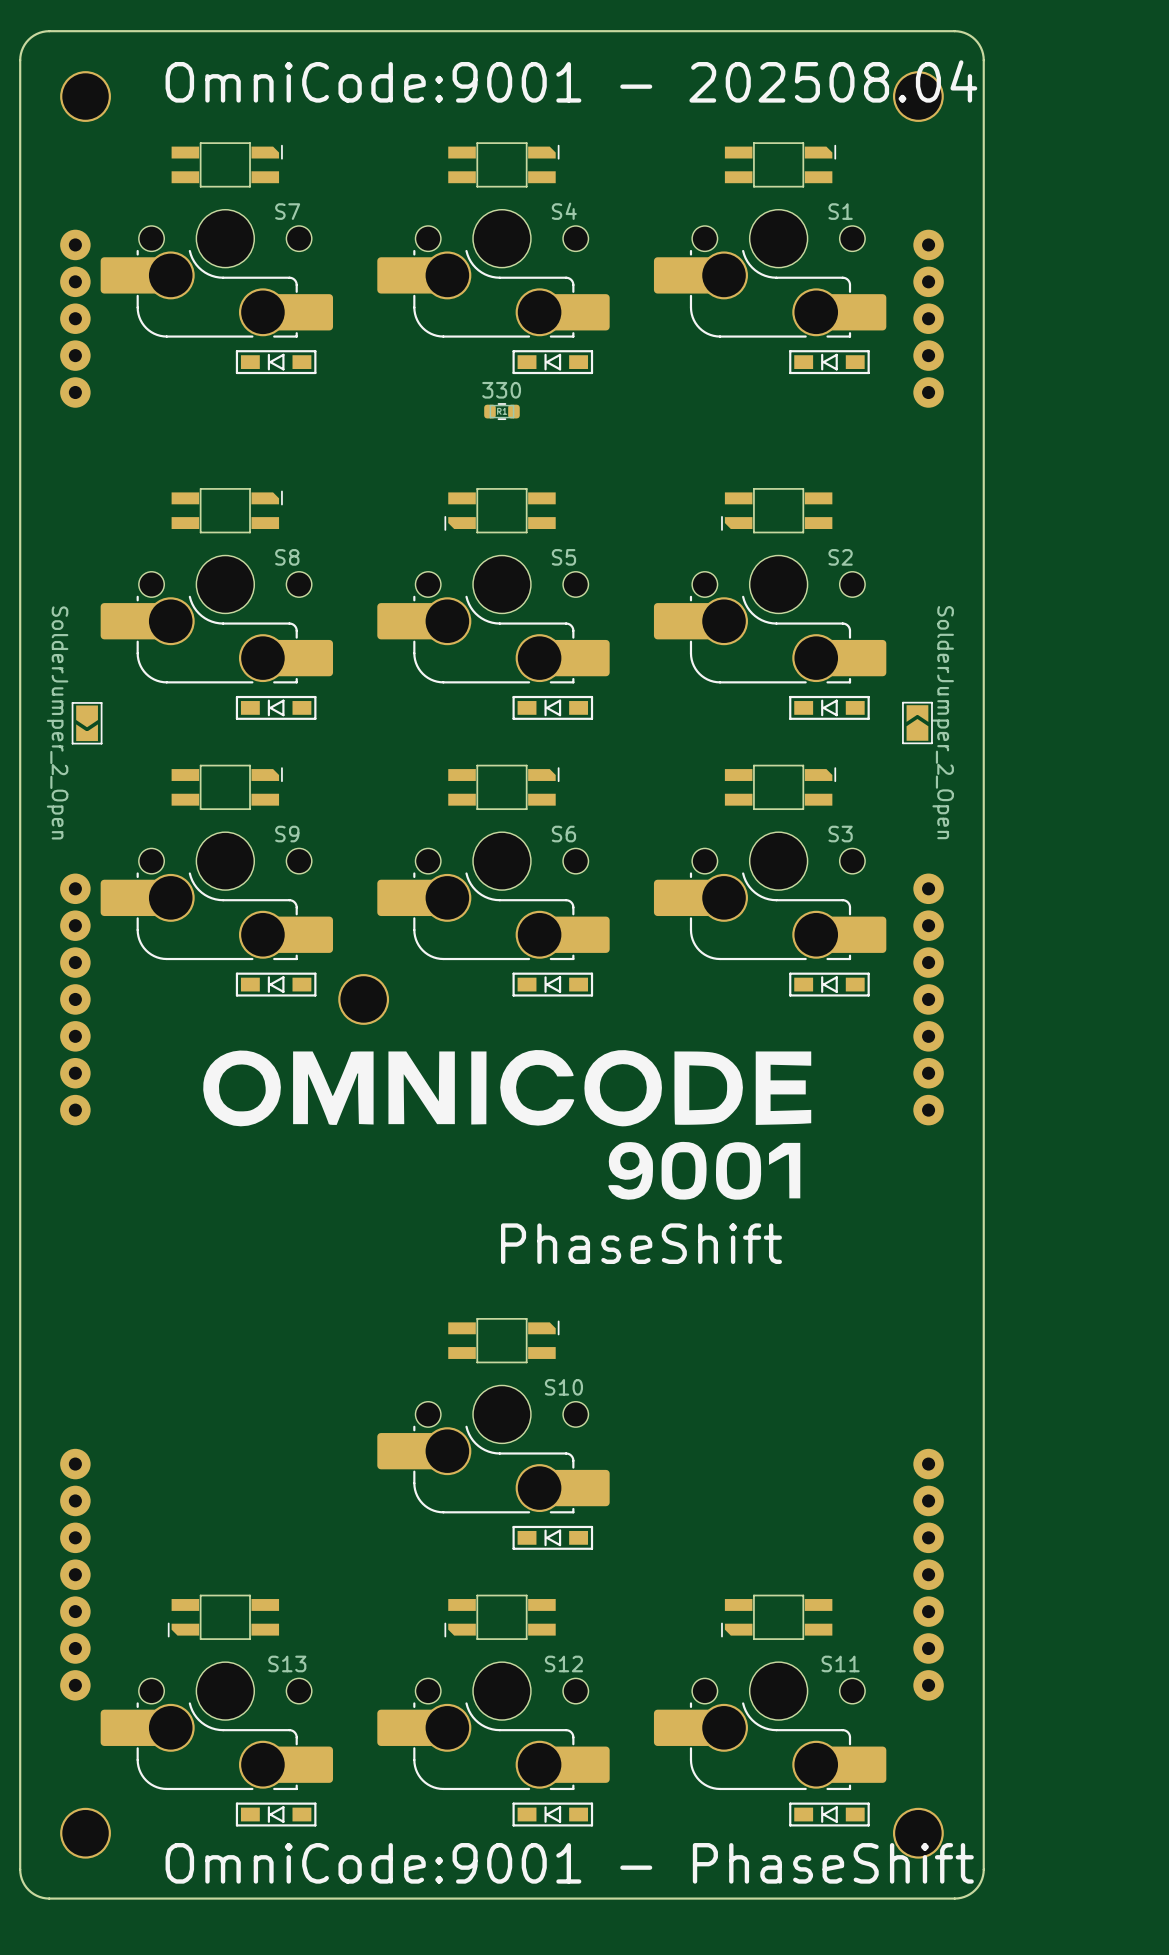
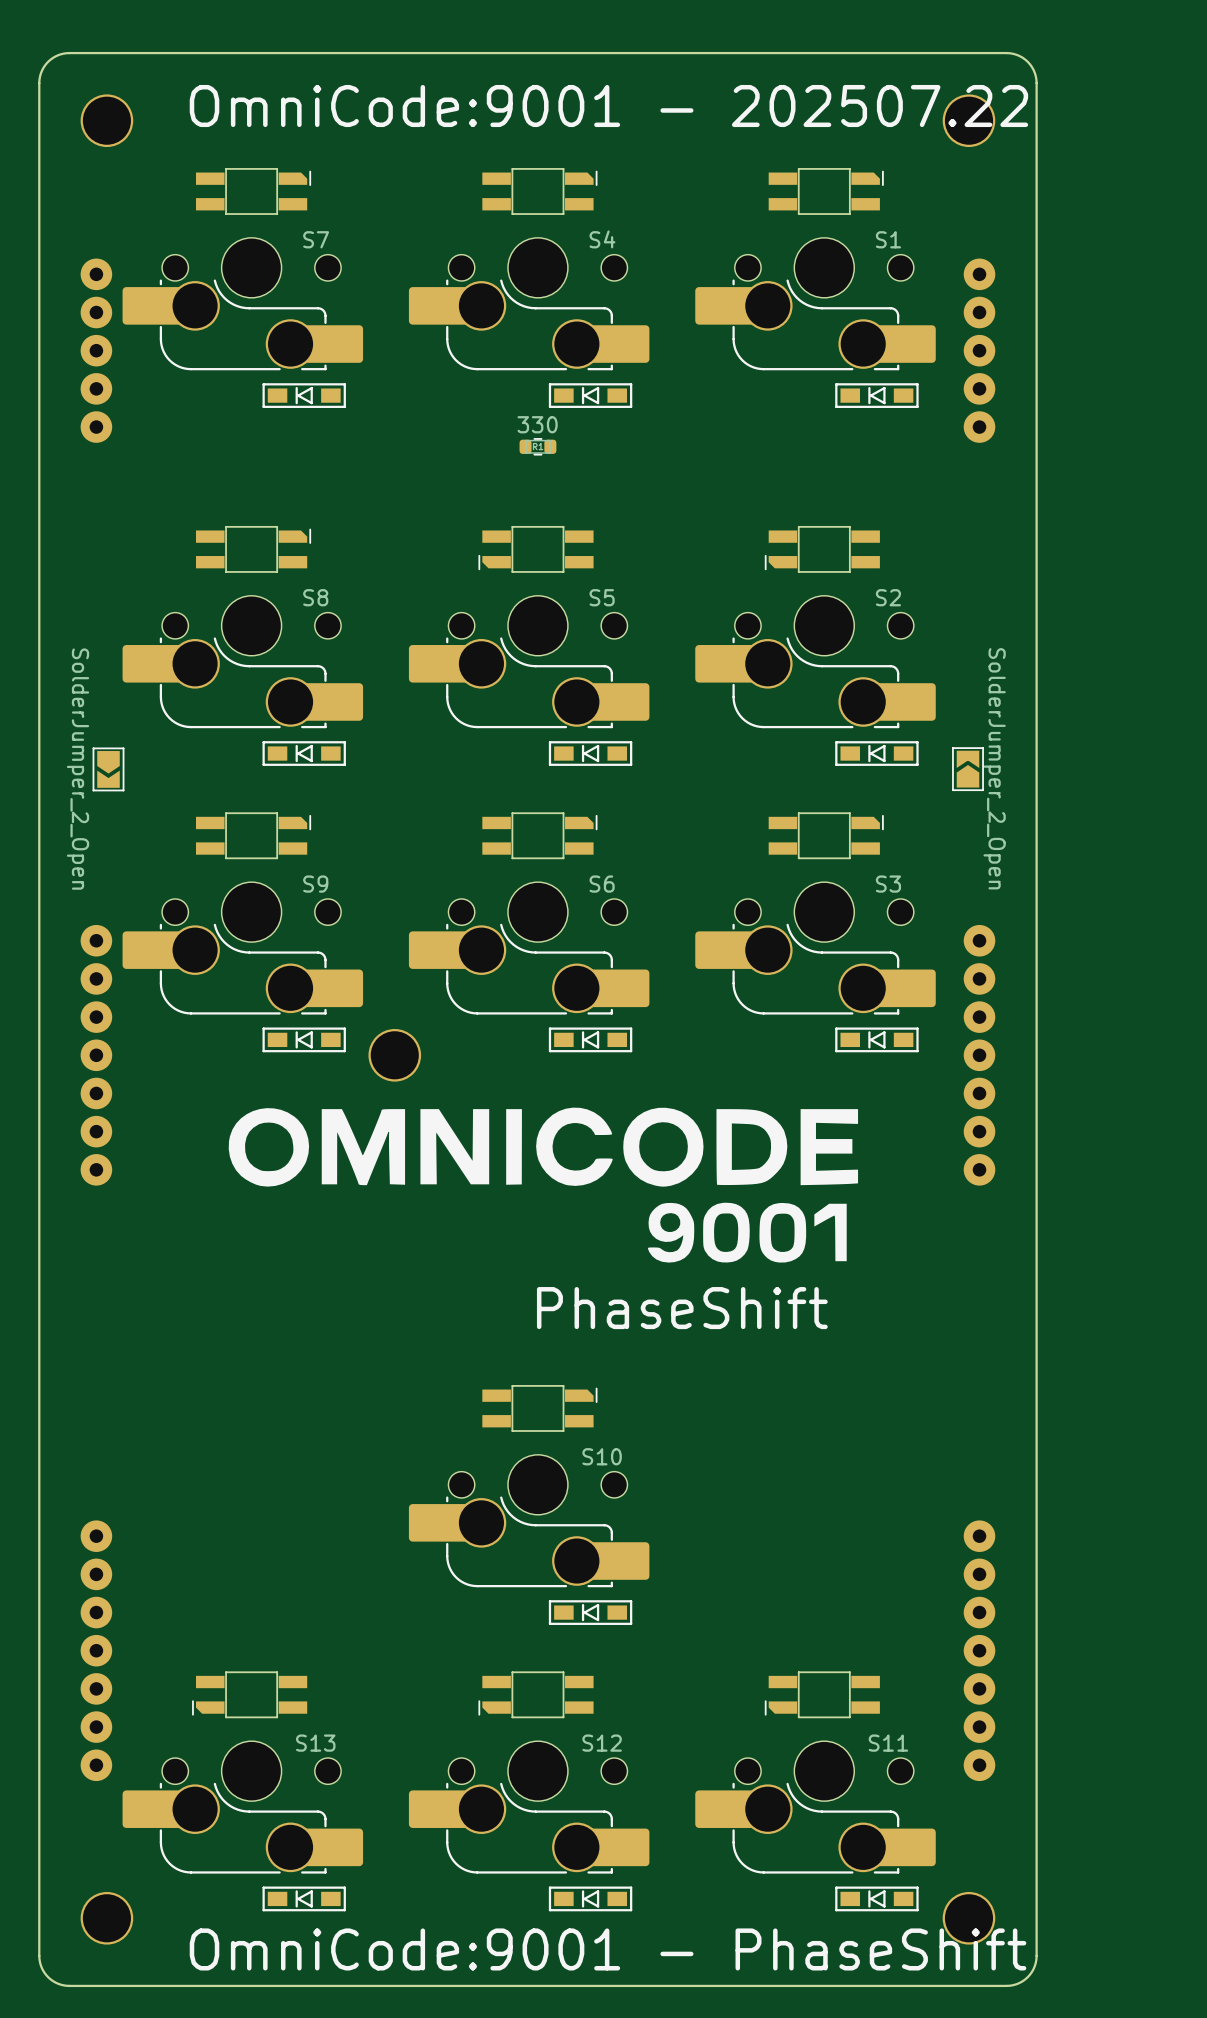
text: OmniCode:9001 - 202508.04 (571, 81) -> OmniCode:9001 - 202507.22 (608, 106)

